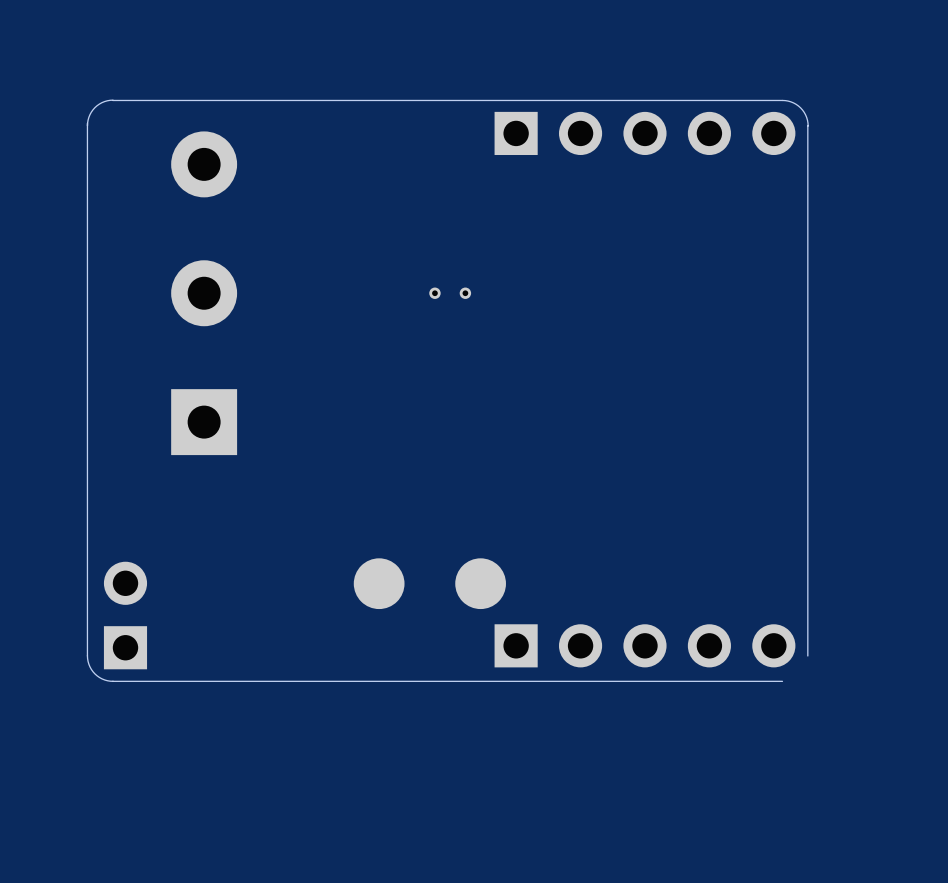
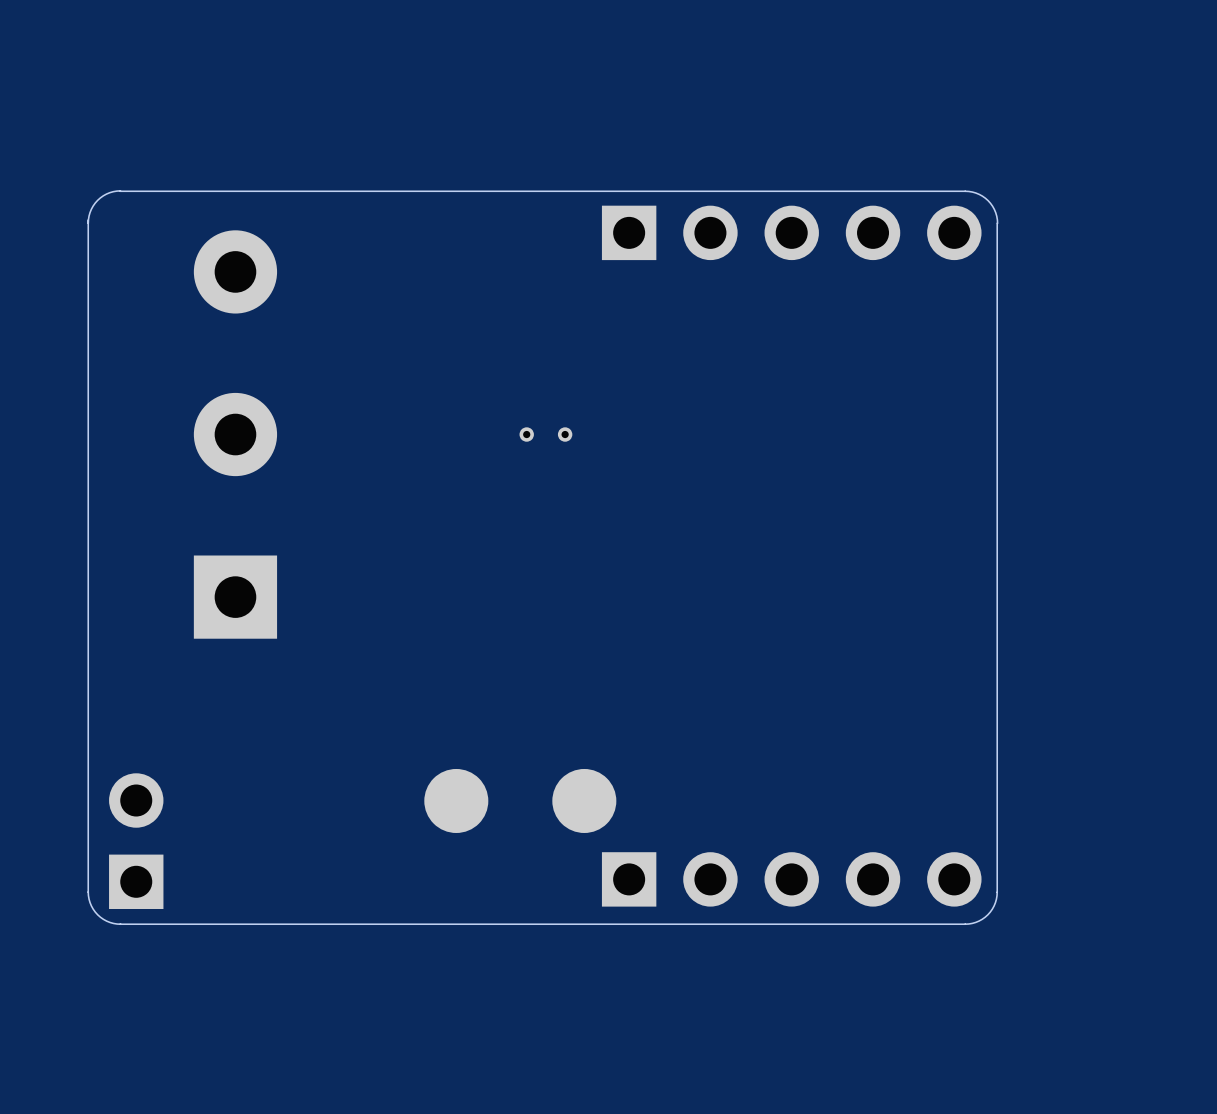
board edge: none -> (997, 892) (995, 902) (987, 914) (979, 921) (965, 924)

